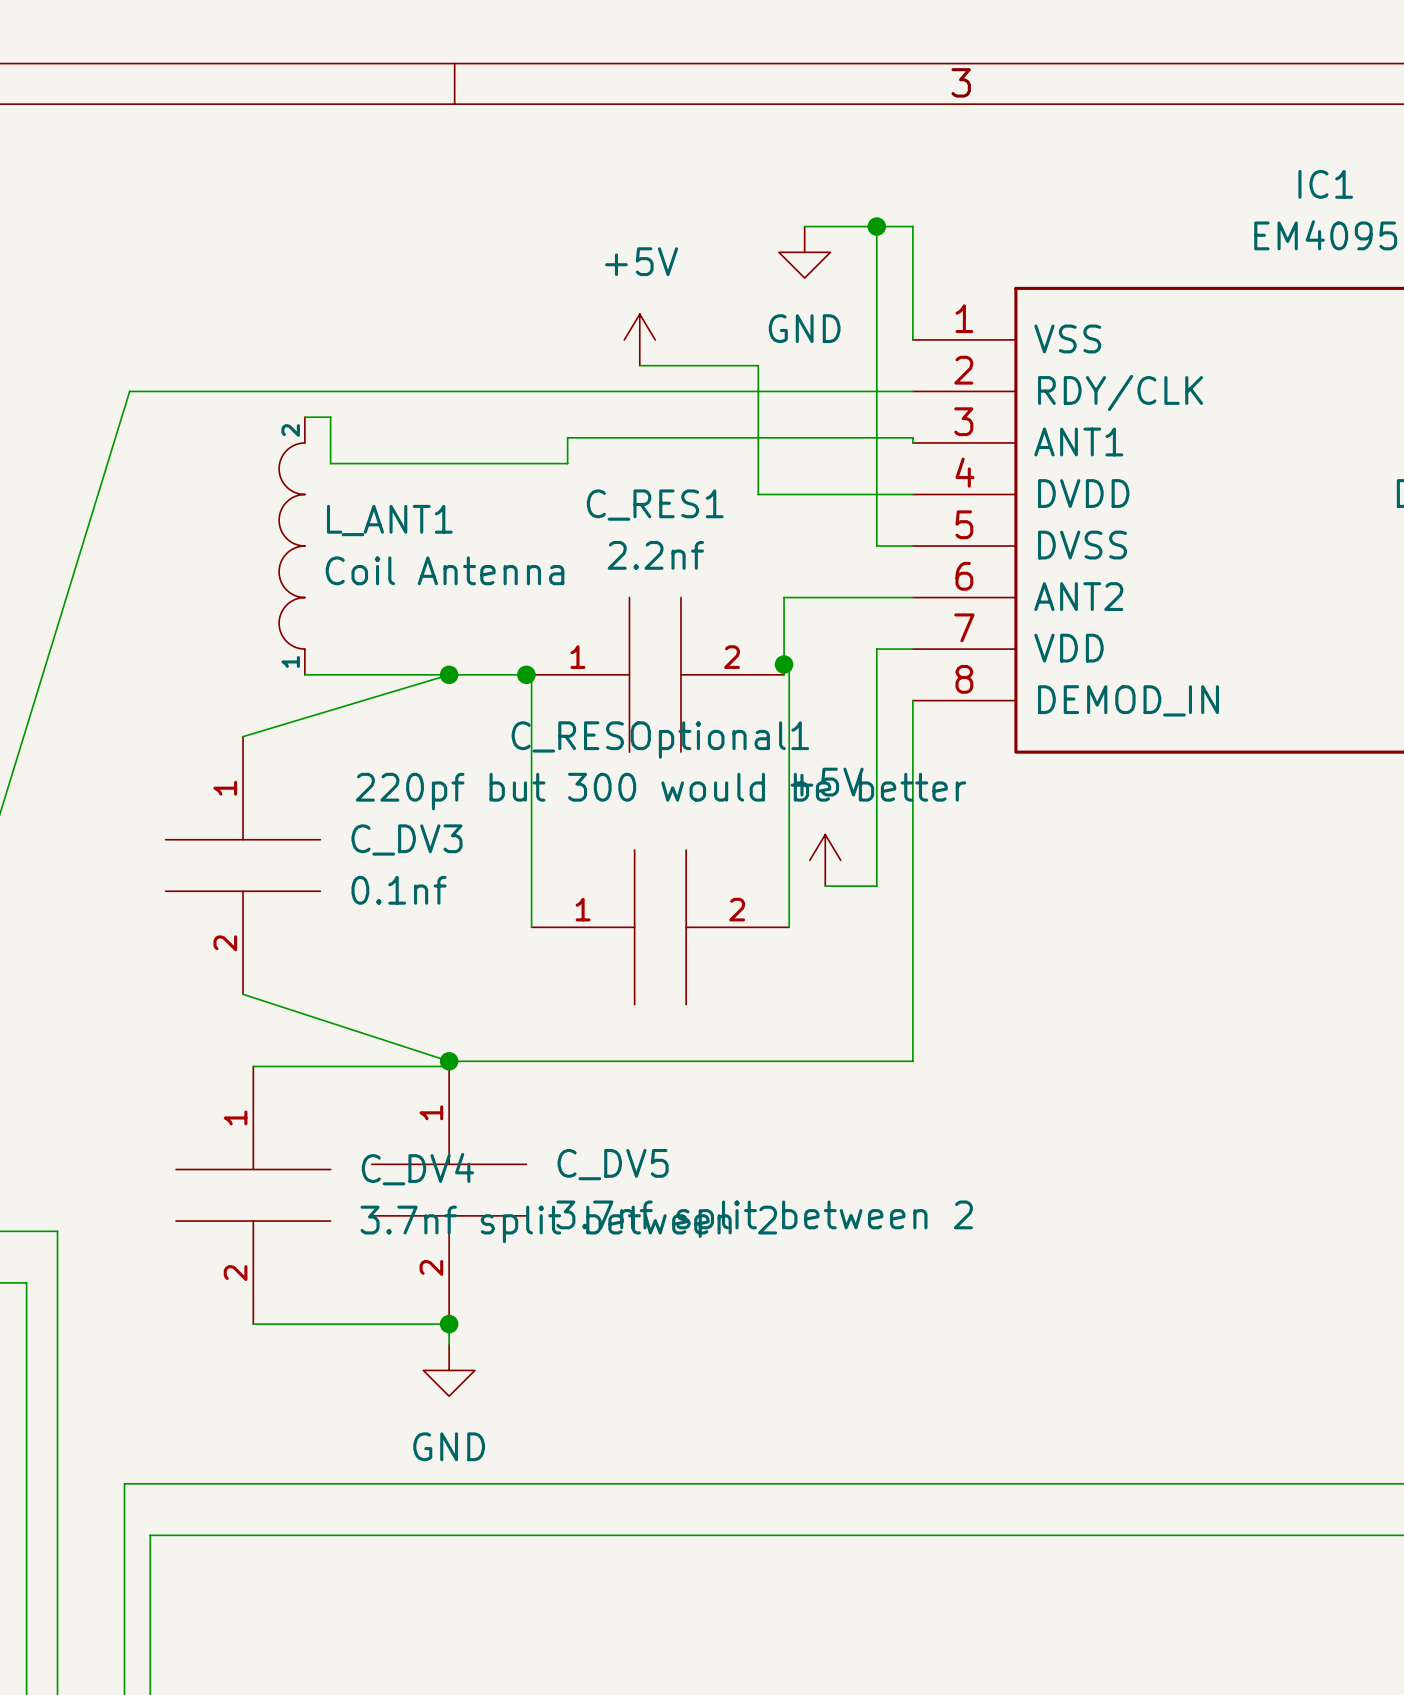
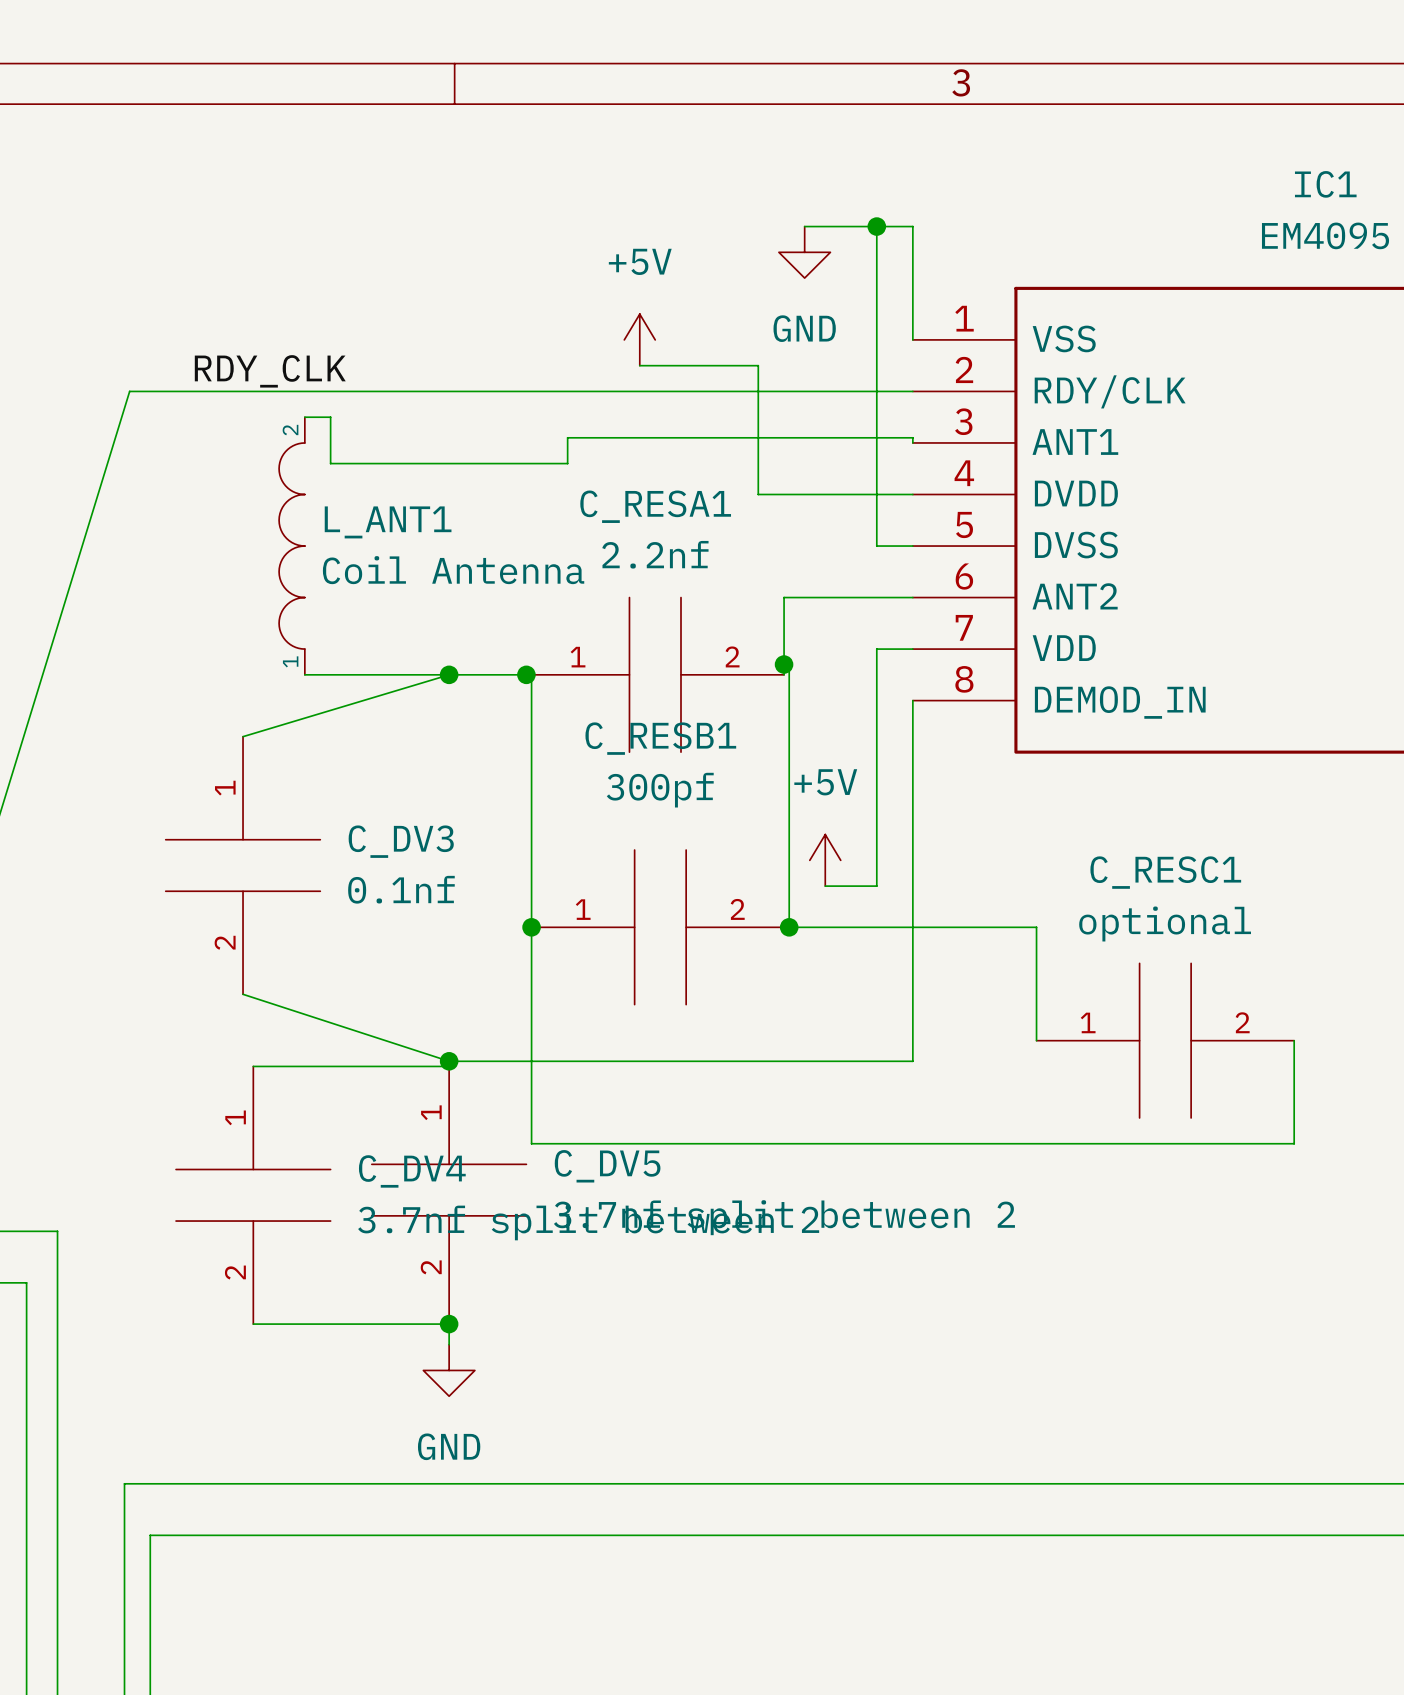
label: none -> RDY_CLK (270, 371)
C_RES1 name: C_RES1 (655, 505) -> C_RESA1 (655, 506)
C_RESOptional1 name: C_RESOptional1 (660, 740) -> C_RESB1 (660, 738)
C_RESOptional1 value: 220pf but 300 would be better (661, 791) -> 300pf (660, 790)
wire: none -> (531, 927) (531, 1143) (1294, 1143) (1294, 1040)
junction: none -> (531, 927)
wire: none -> (789, 927) (1036, 927) (1036, 1040)
junction: none -> (789, 927)
C_RESC1: none -> optional (1165, 1040)

